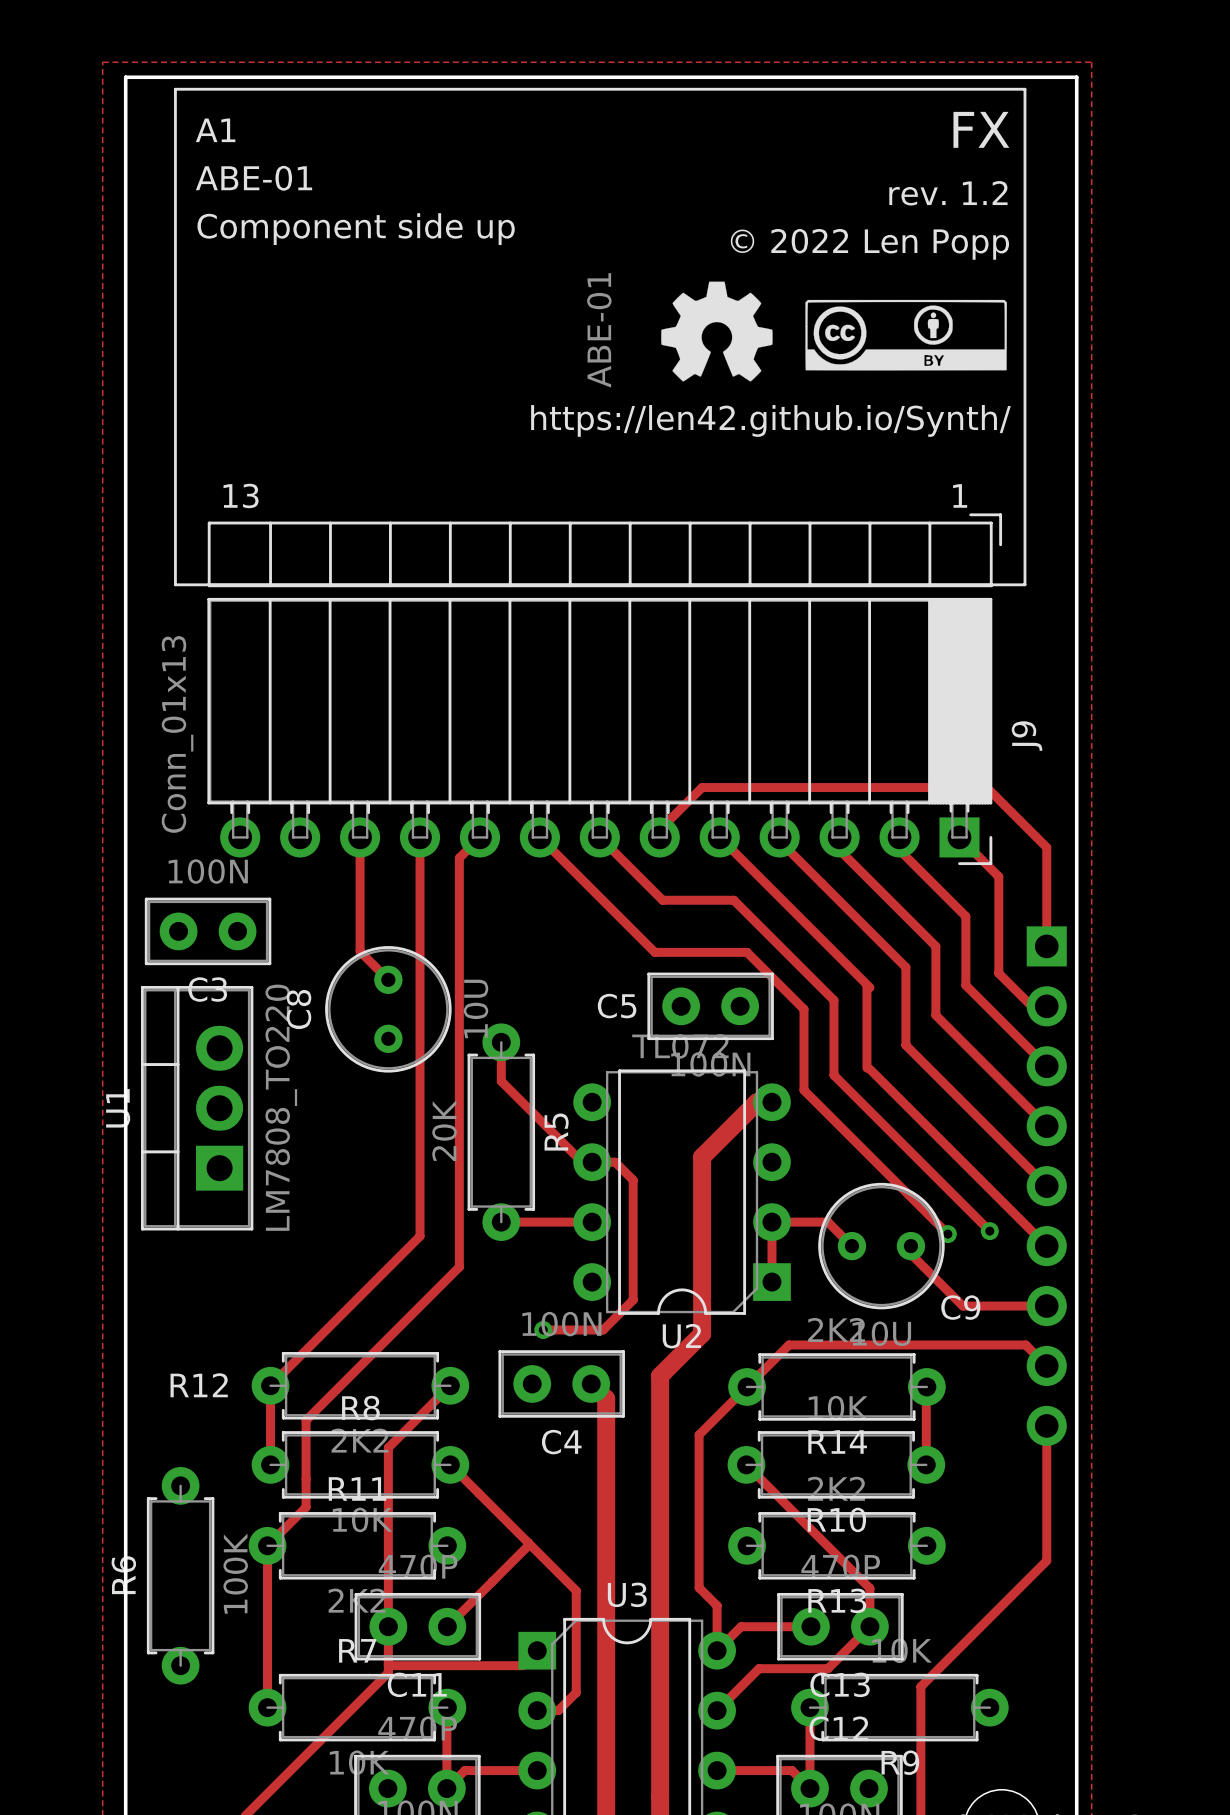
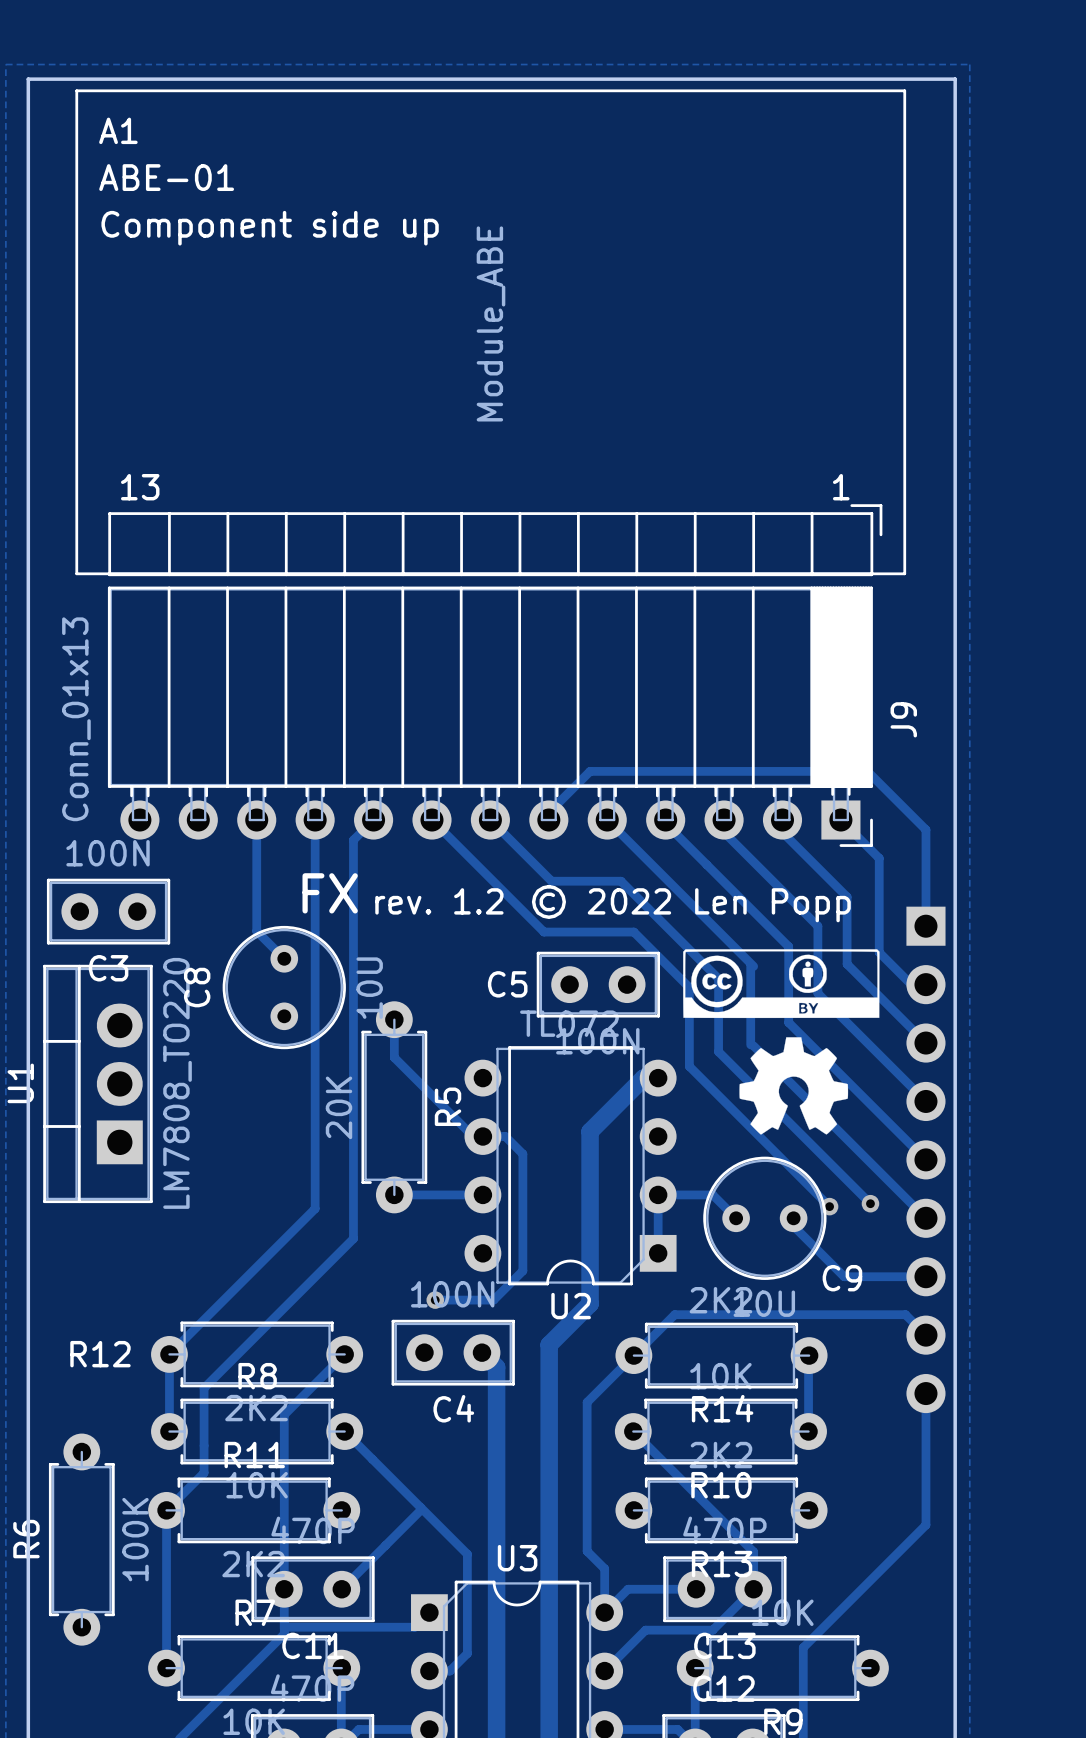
text: FX (981, 129) -> none
text: rev. 1.2 (948, 193) -> none
text: © 2022 Len Popp (869, 244) -> none
drawing: [661, 281, 773, 382] -> none
drawing: [805, 299, 1007, 371] -> none
A1 value: ABE-01 (599, 330) -> Module_ABE (490, 323)
text: https://len42.github.io/Synth/ (770, 420) -> none
text: none -> FX (330, 893)
text: none -> rev. 1.2 (439, 901)
text: none -> © 2022 Len Popp (691, 903)
drawing: none -> [683, 949, 880, 1135]

